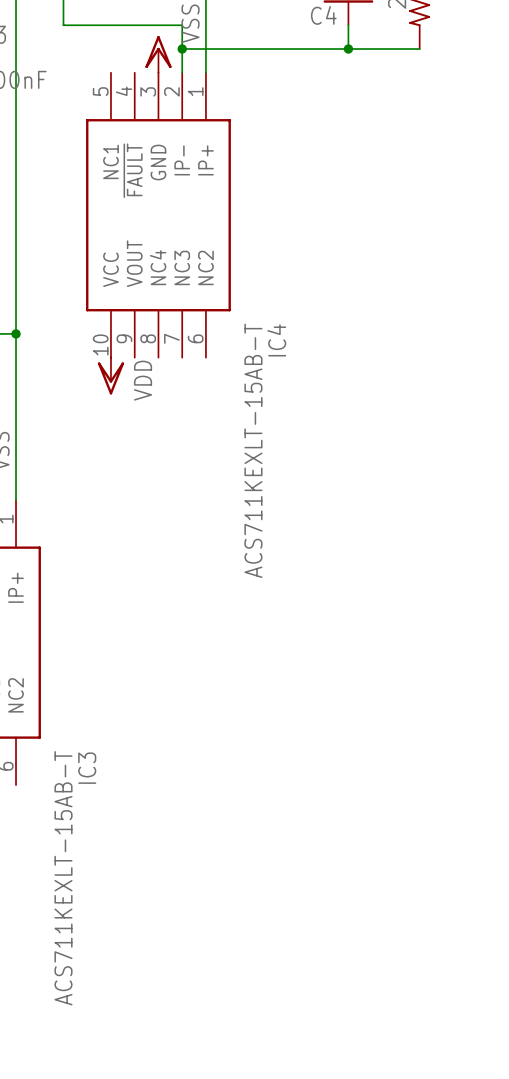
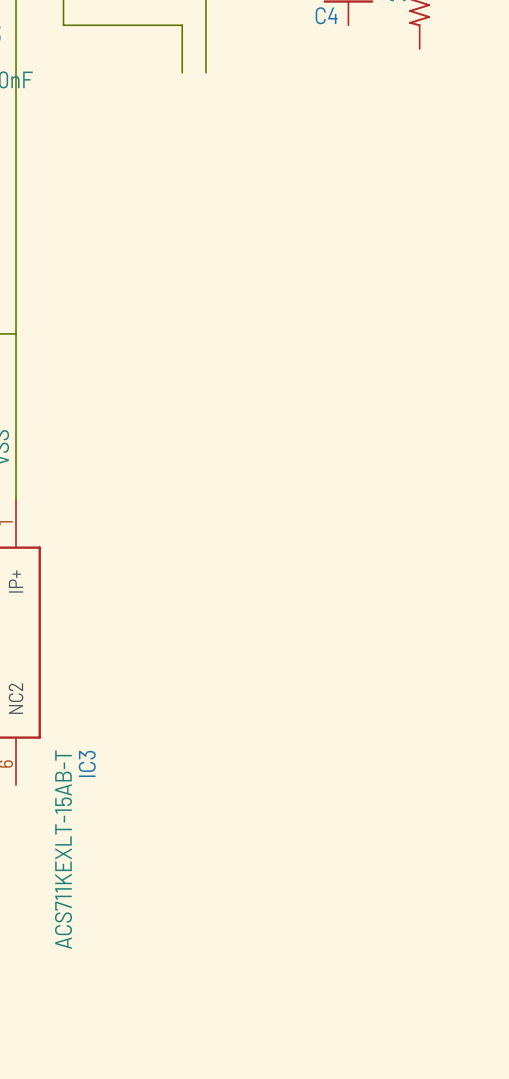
wire: (348, 25) (348, 49) -> none
wire: (182, 49) (419, 49) -> none
junction: (182, 49) -> none
junction: (348, 49) -> none
power symbol: VSS (158, 54) -> none
IC4: ACS711KEXLT-15AB-T (158, 215) -> none
junction: (16, 333) -> none
power symbol: VDD (110, 376) -> none

